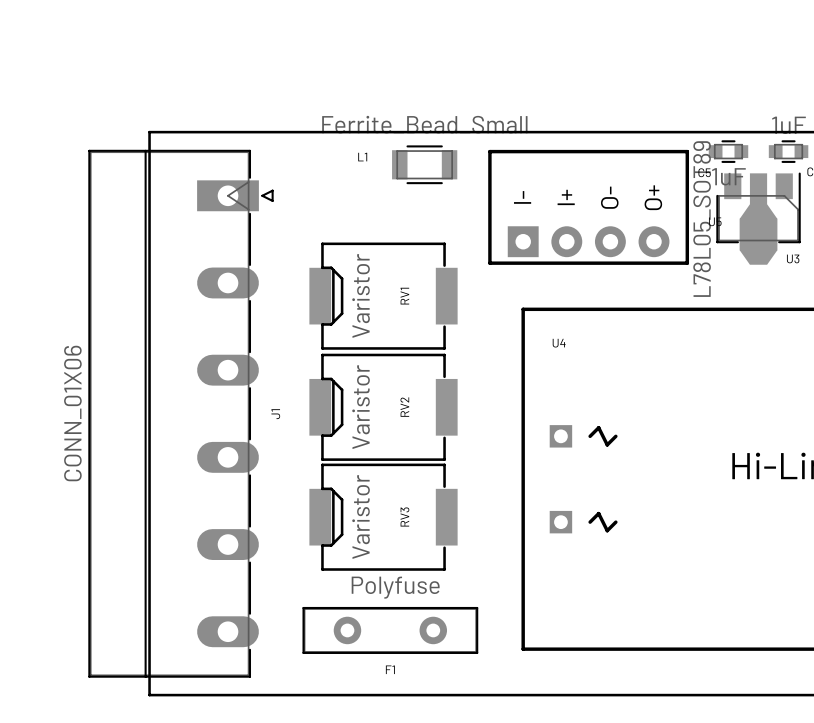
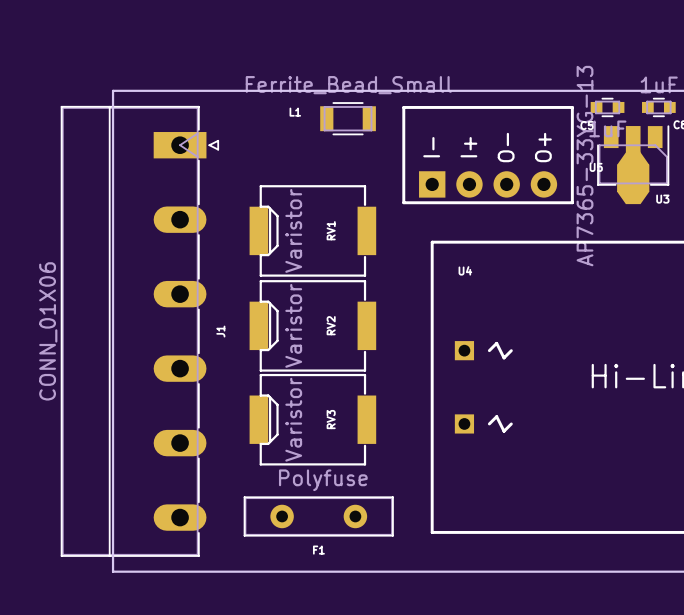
U3 value: L78L05_SOT89 (702, 219) -> AP7365-33YG-13 (585, 166)

